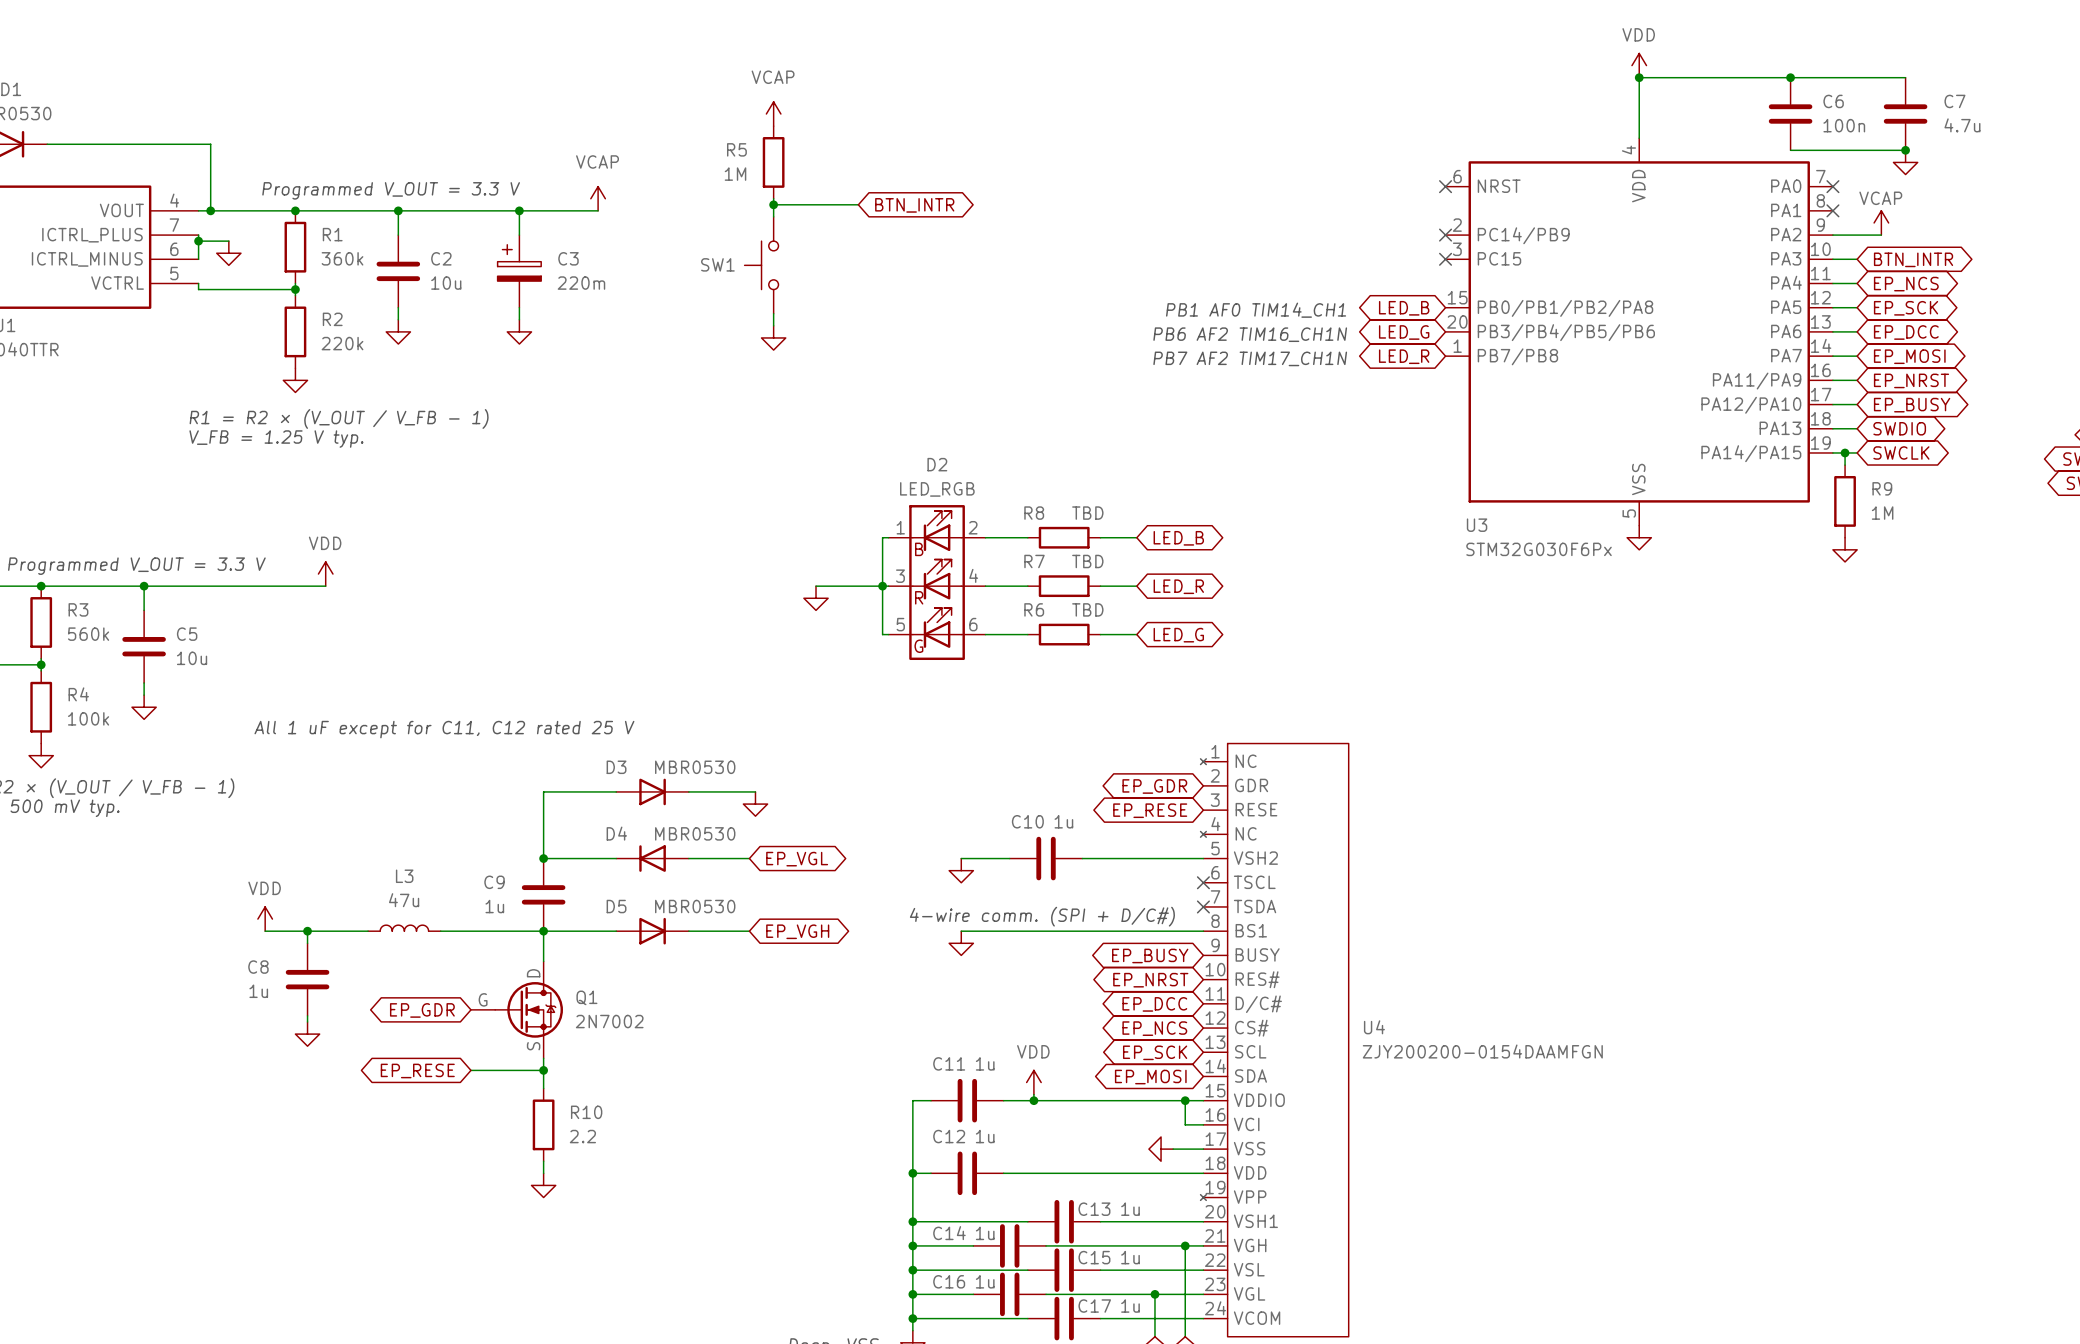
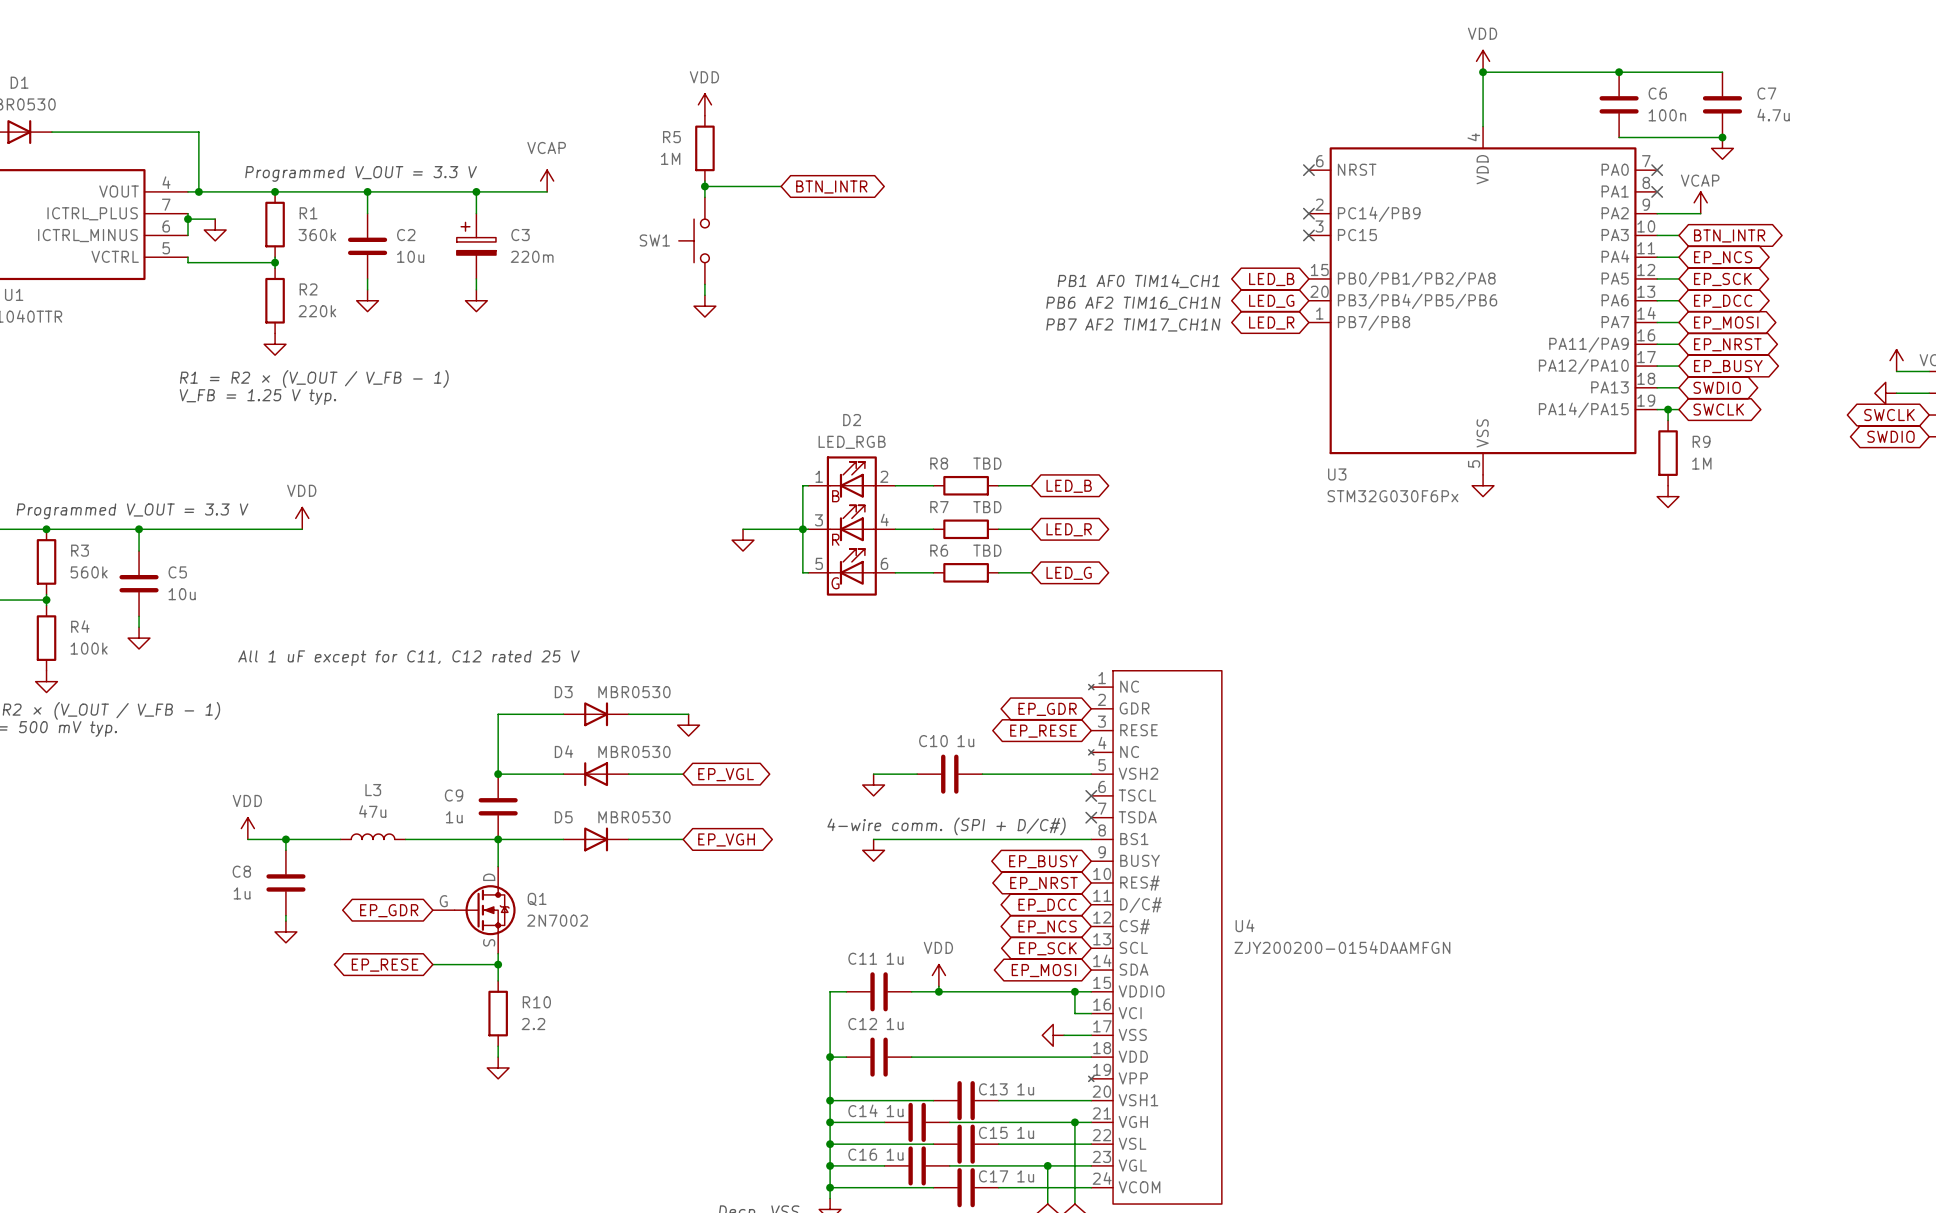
power symbol: VCAP (773, 114) -> VDD (704, 104)

